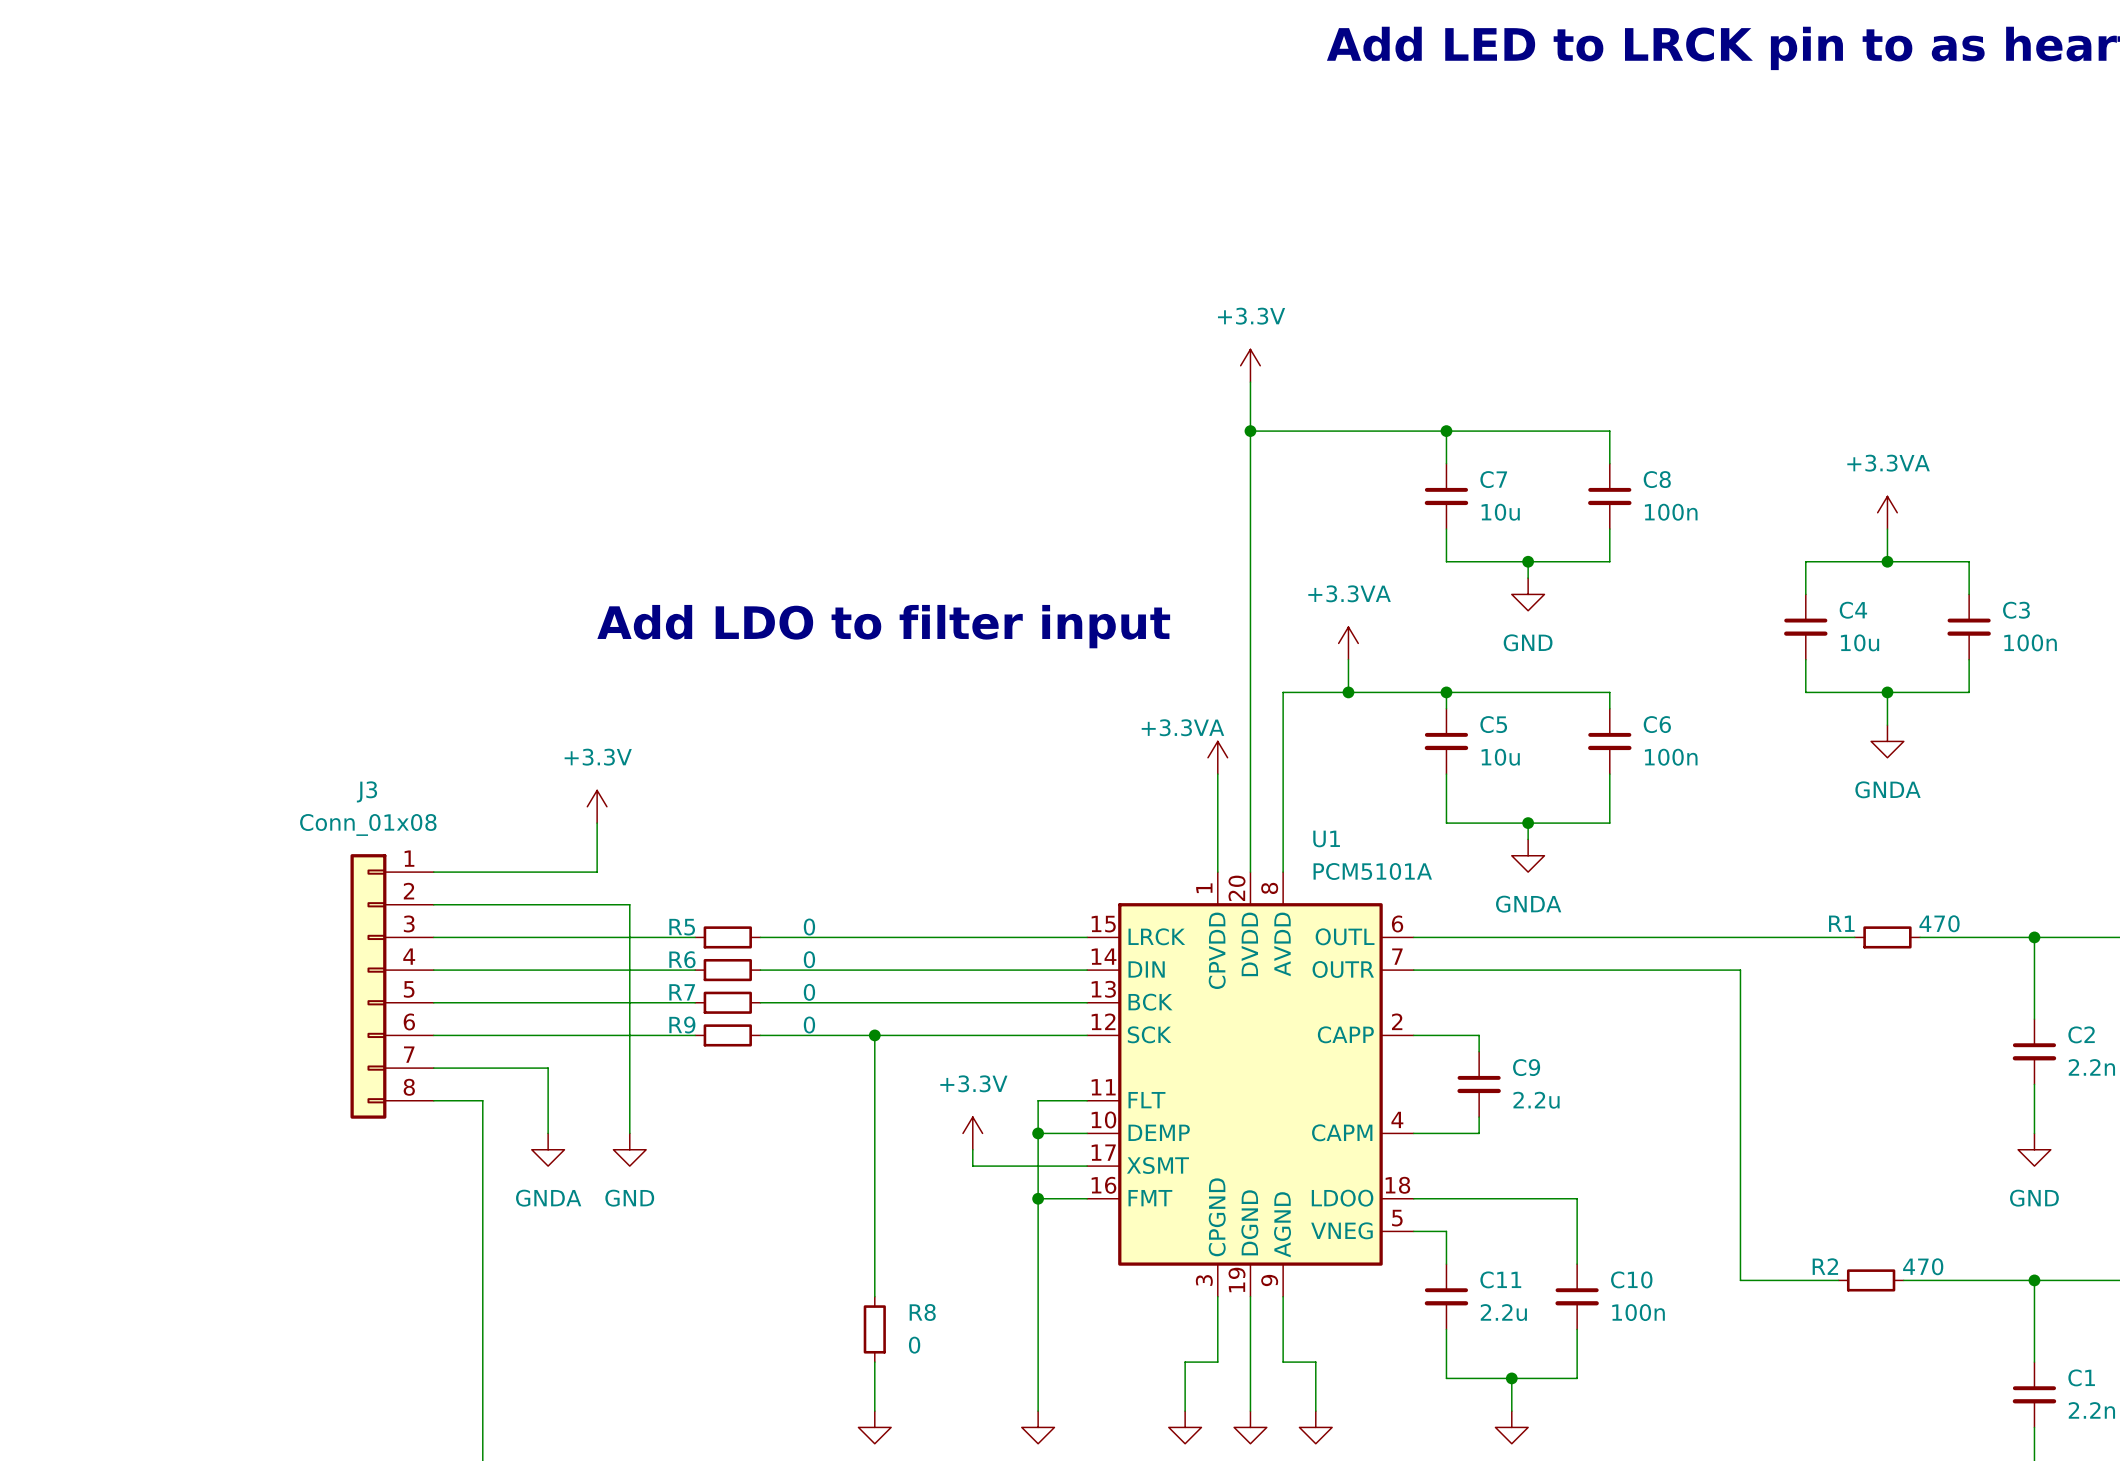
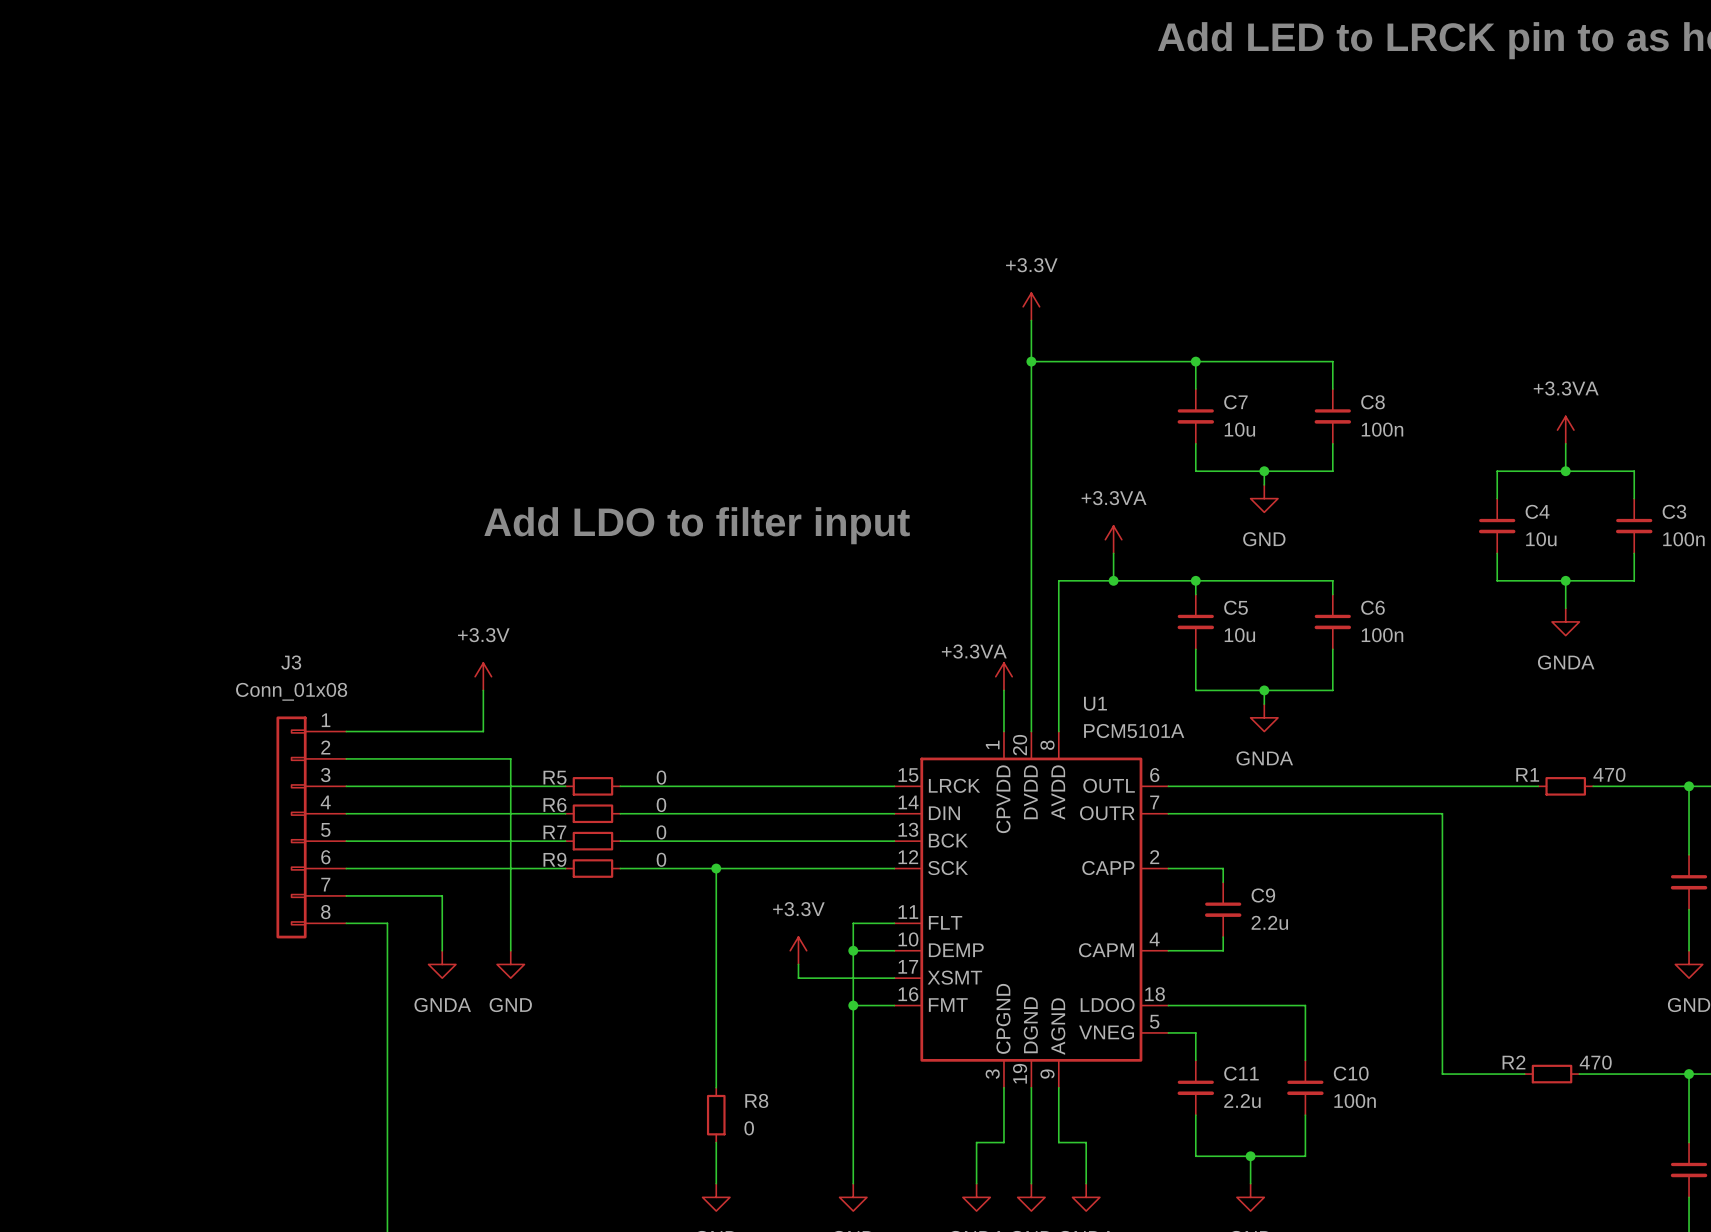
power symbol position: +3.3VA (1217, 757) -> +3.3VA (1003, 676)

